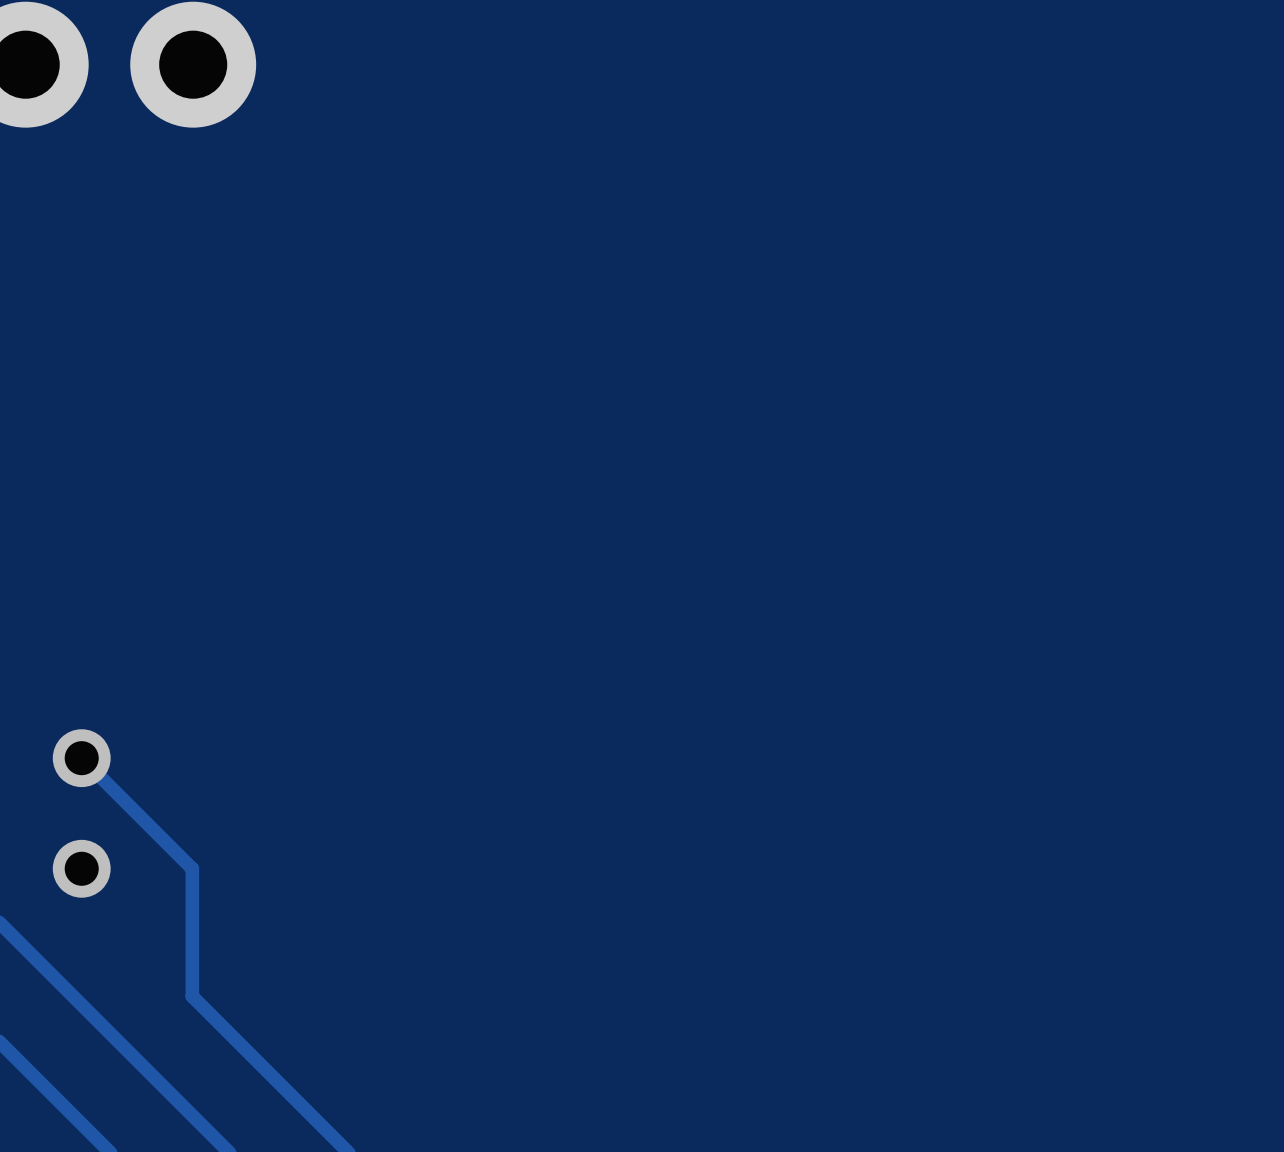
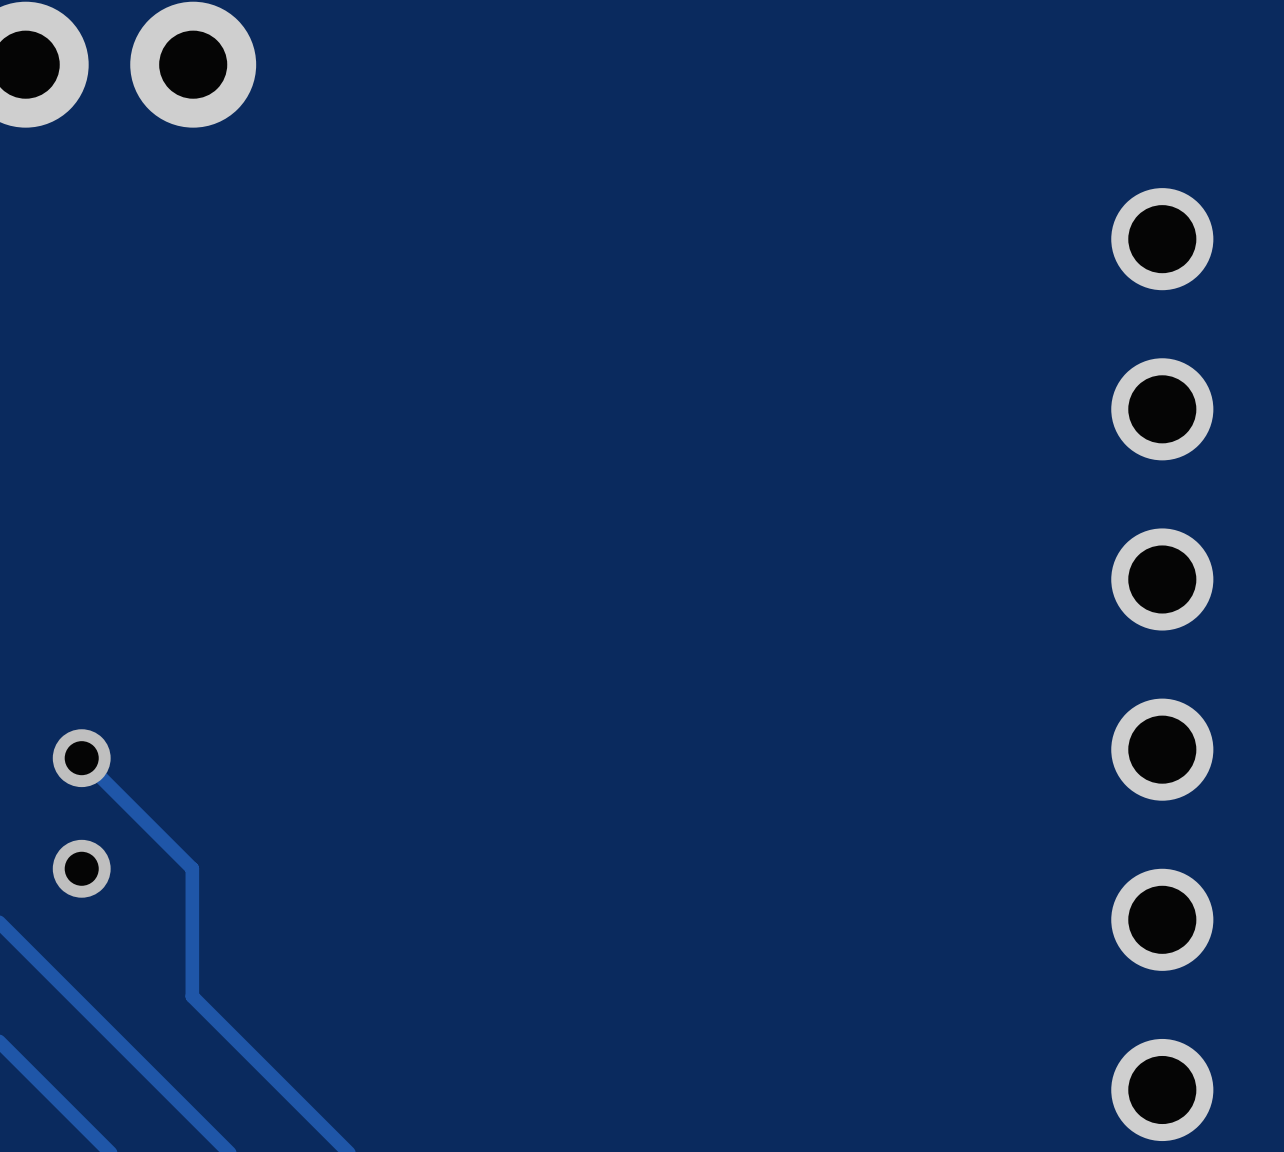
part: none -> (1162, 664)

